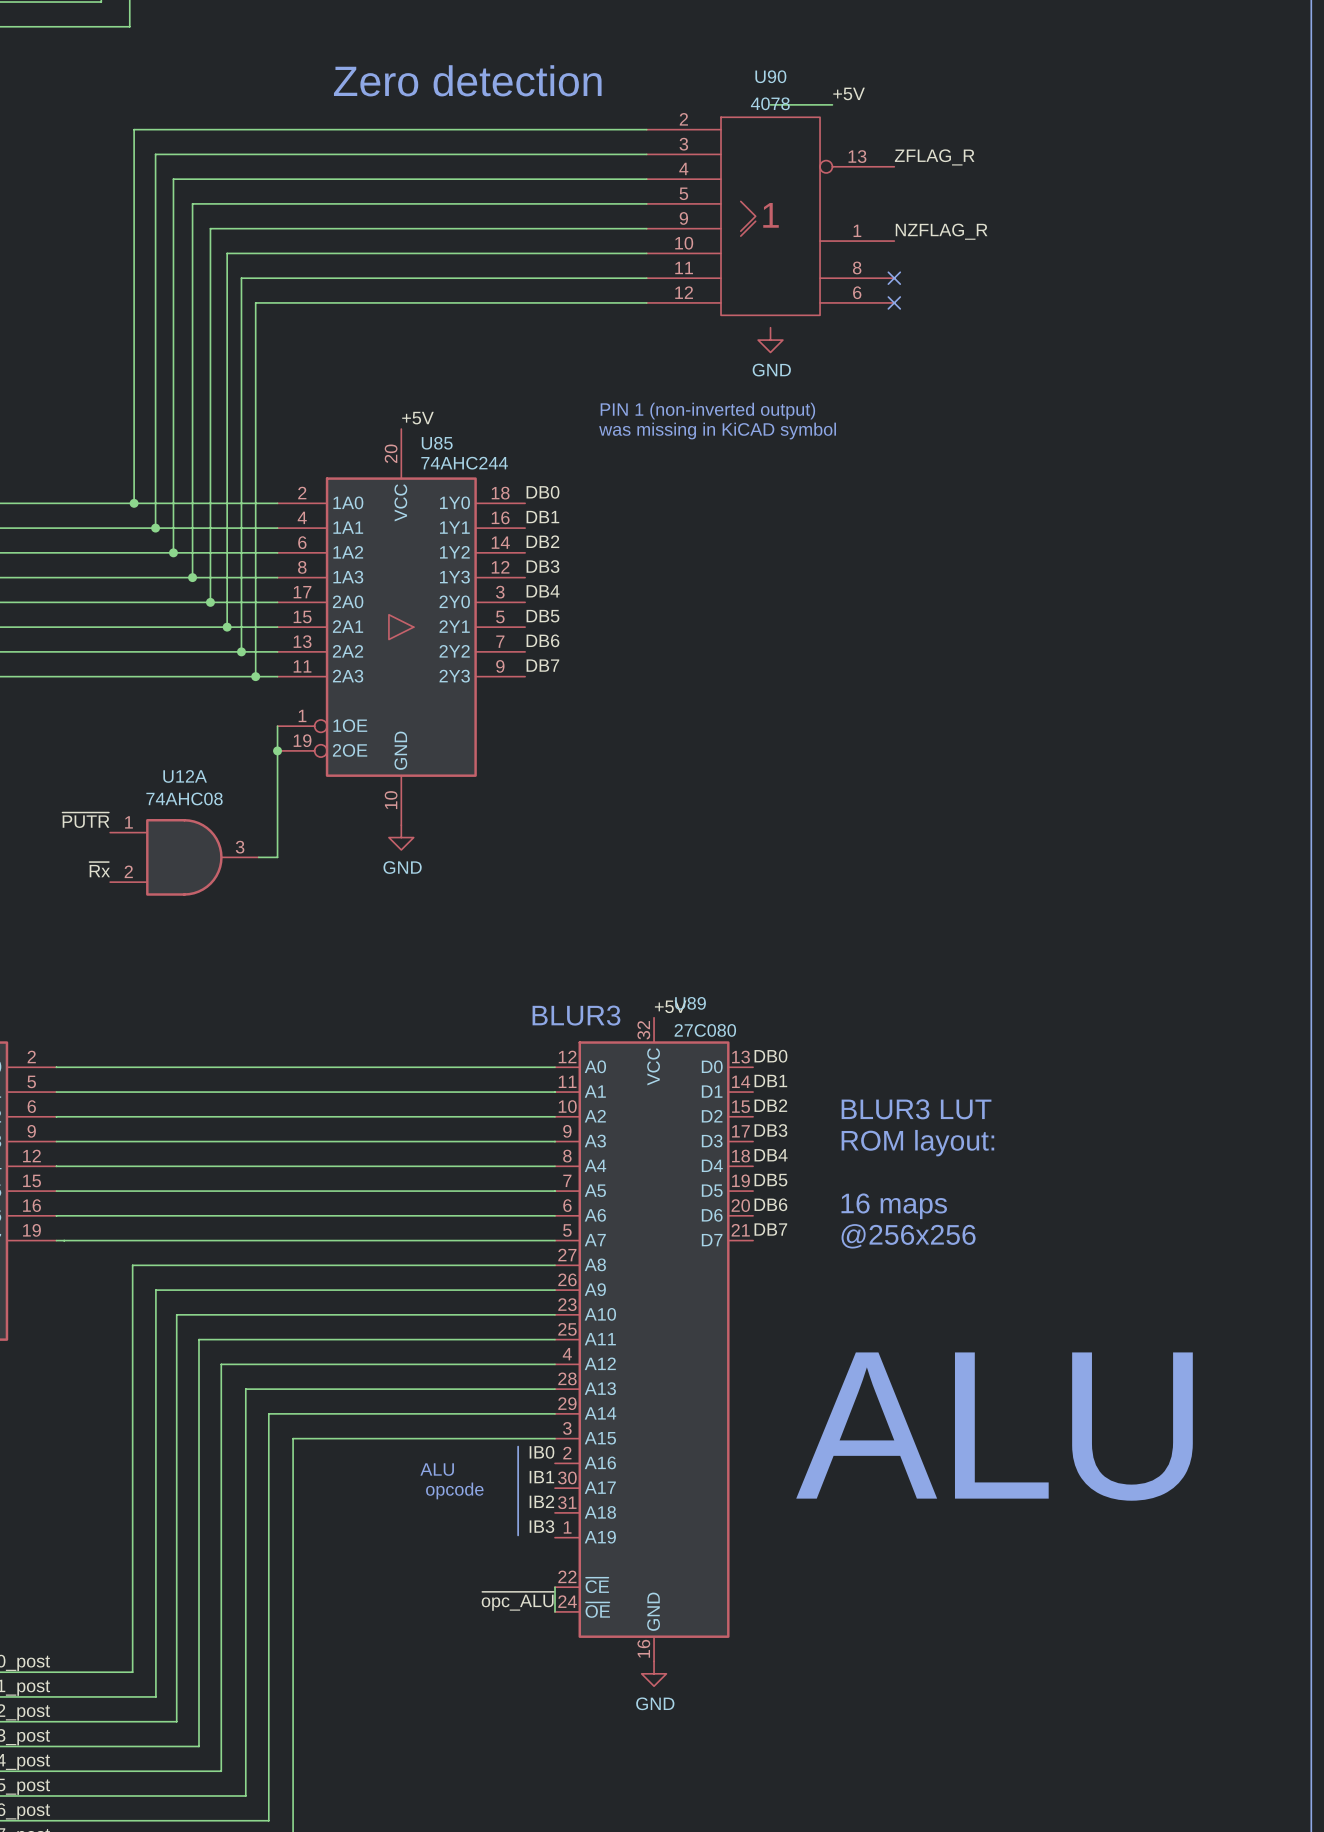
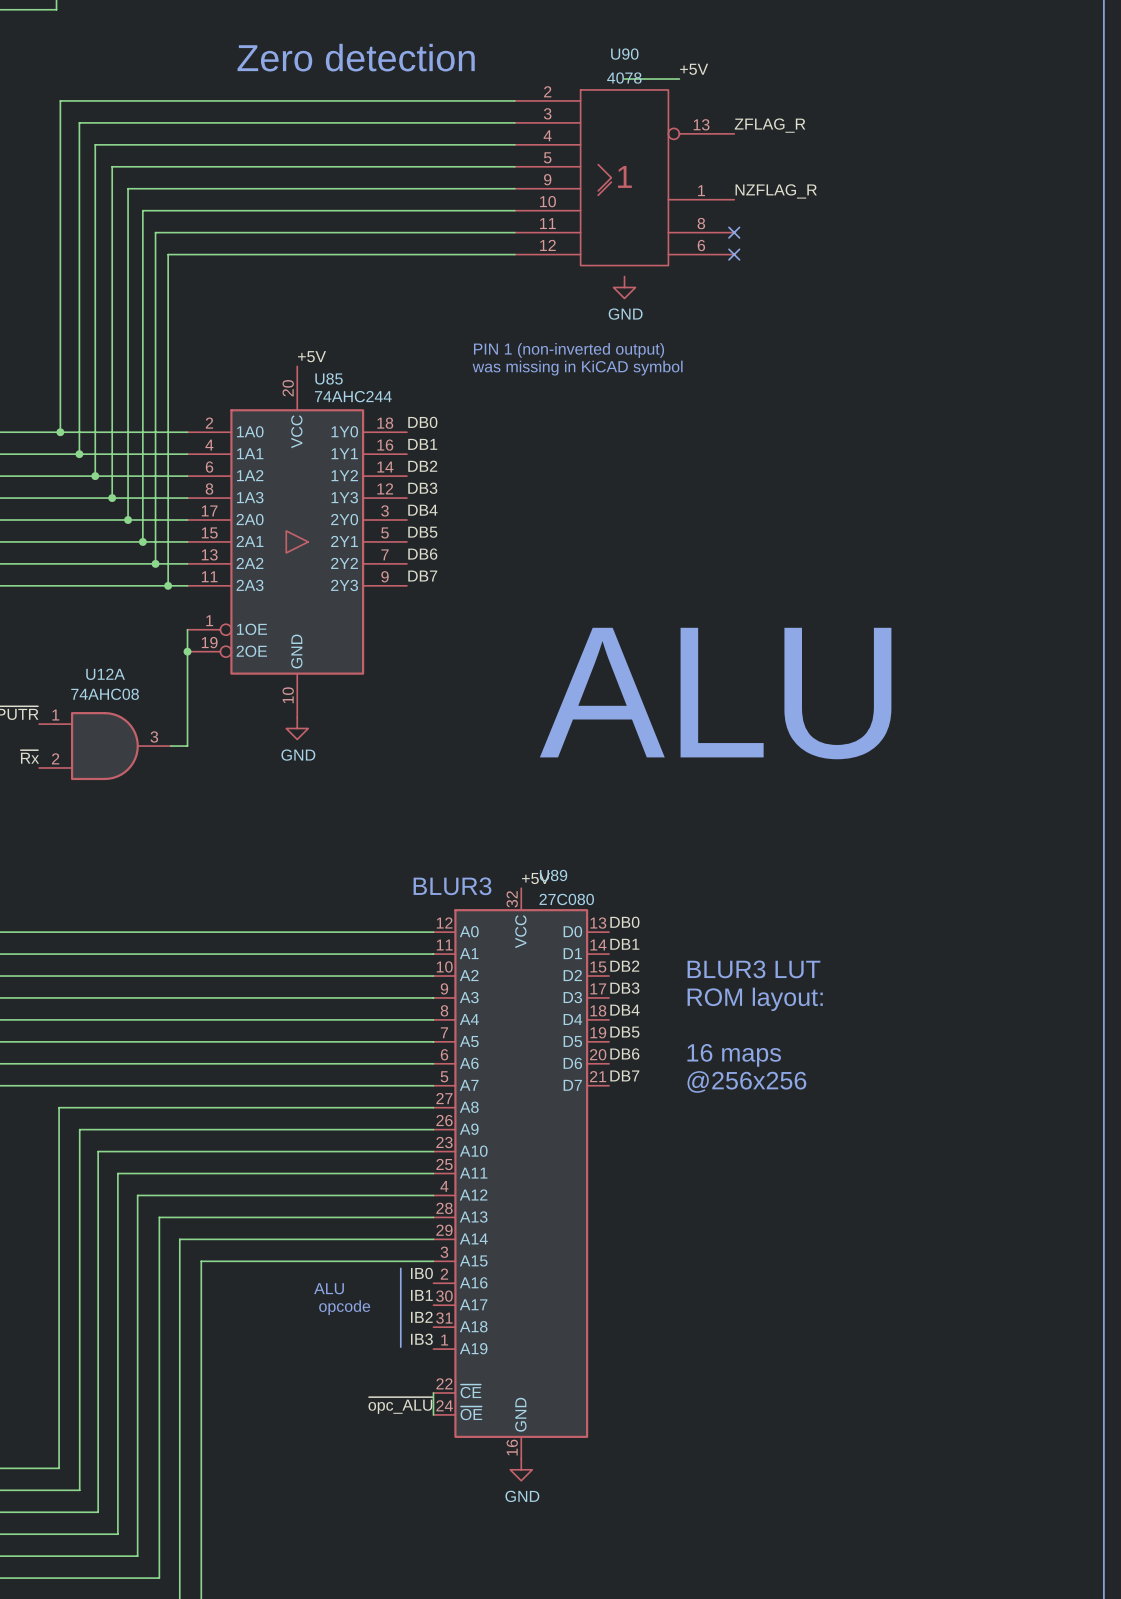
text: none -> ALU (715, 693)
text: ALU (994, 1426) -> none

